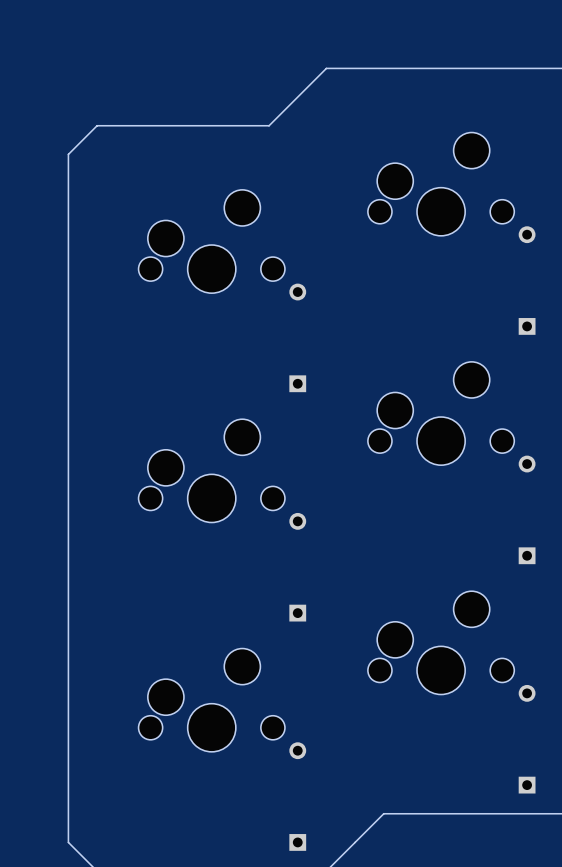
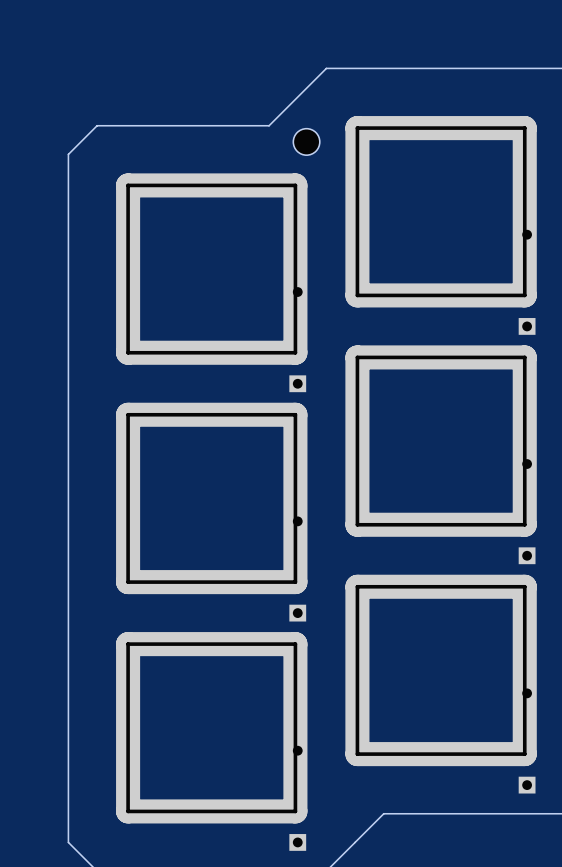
part: none -> (306, 141)
part: (441, 184) -> none
part: none -> (441, 211)
part: (211, 241) -> none
part: none -> (211, 269)
part: (441, 413) -> none
part: none -> (441, 441)
part: (211, 470) -> none
part: none -> (211, 498)
part: (441, 642) -> none
part: none -> (441, 670)
part: (211, 700) -> none
part: none -> (211, 727)

